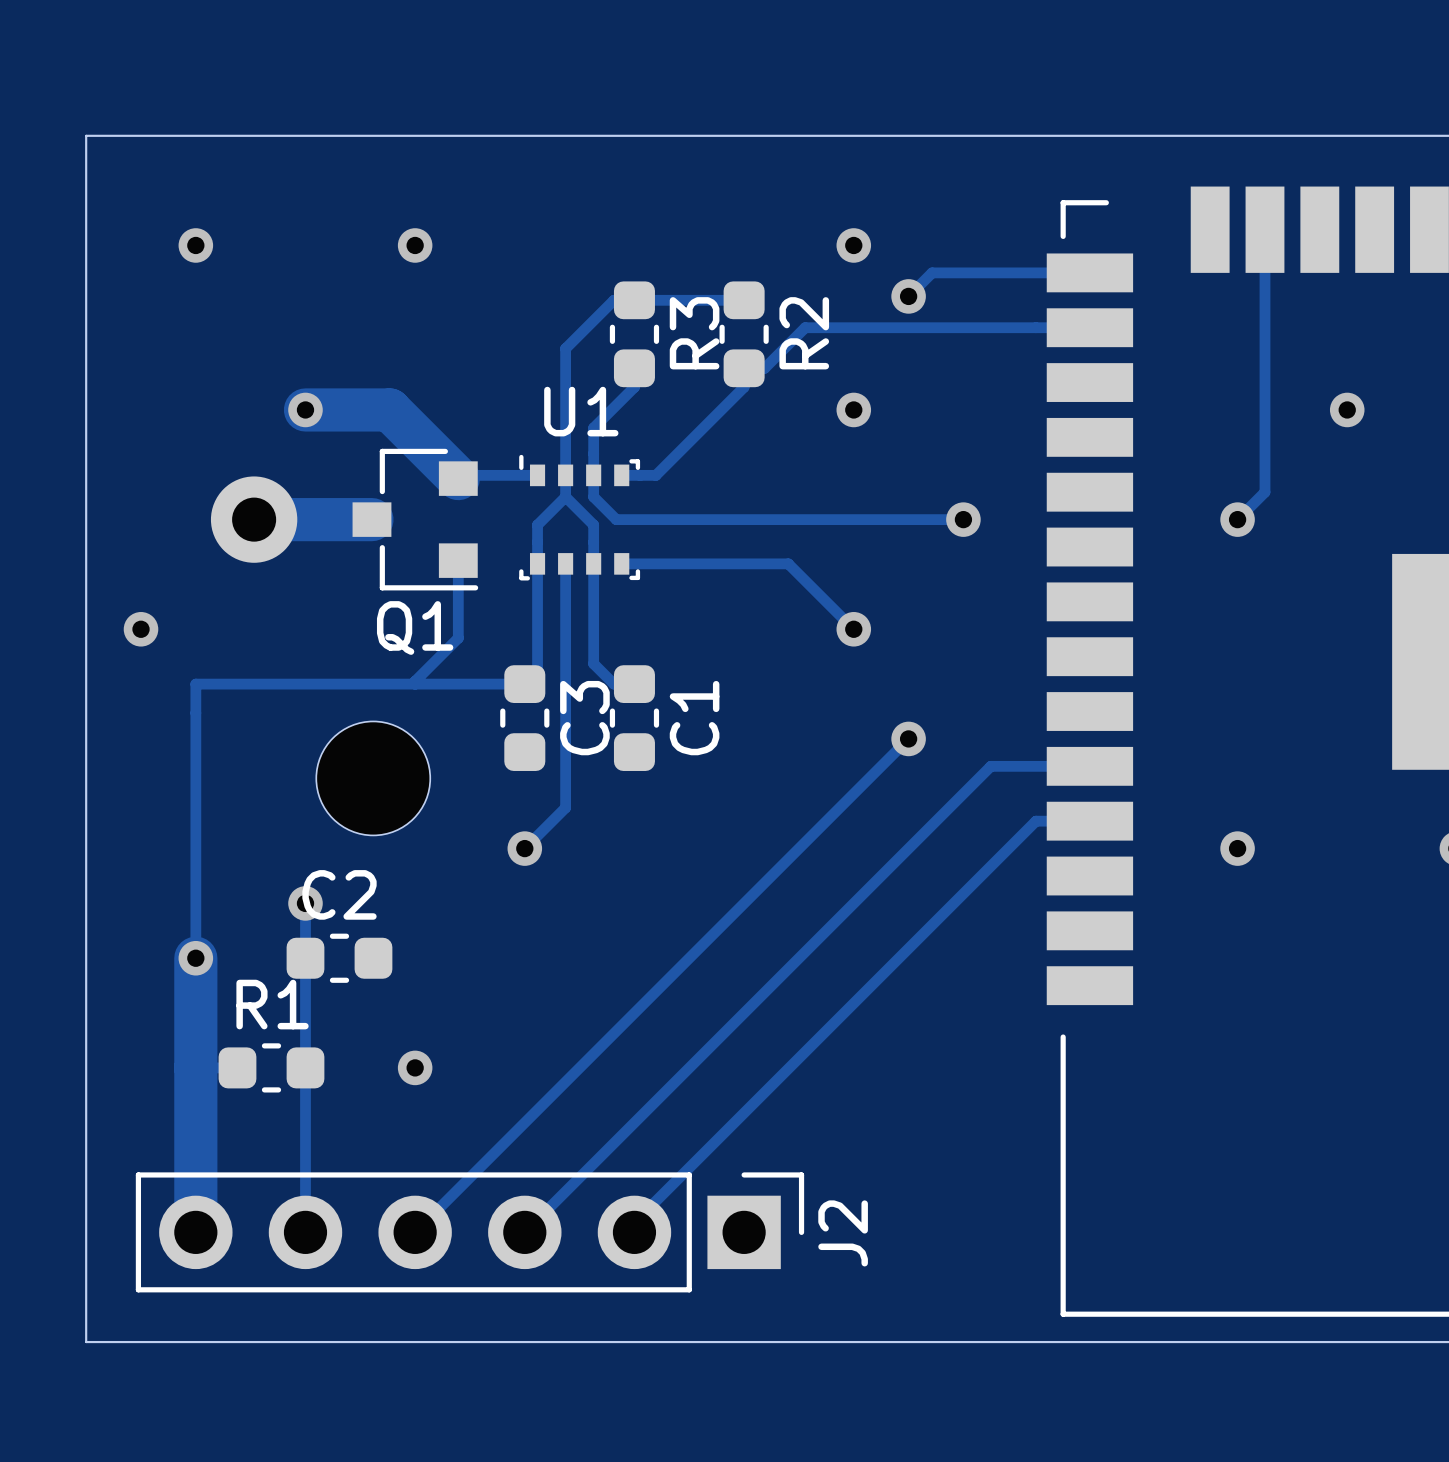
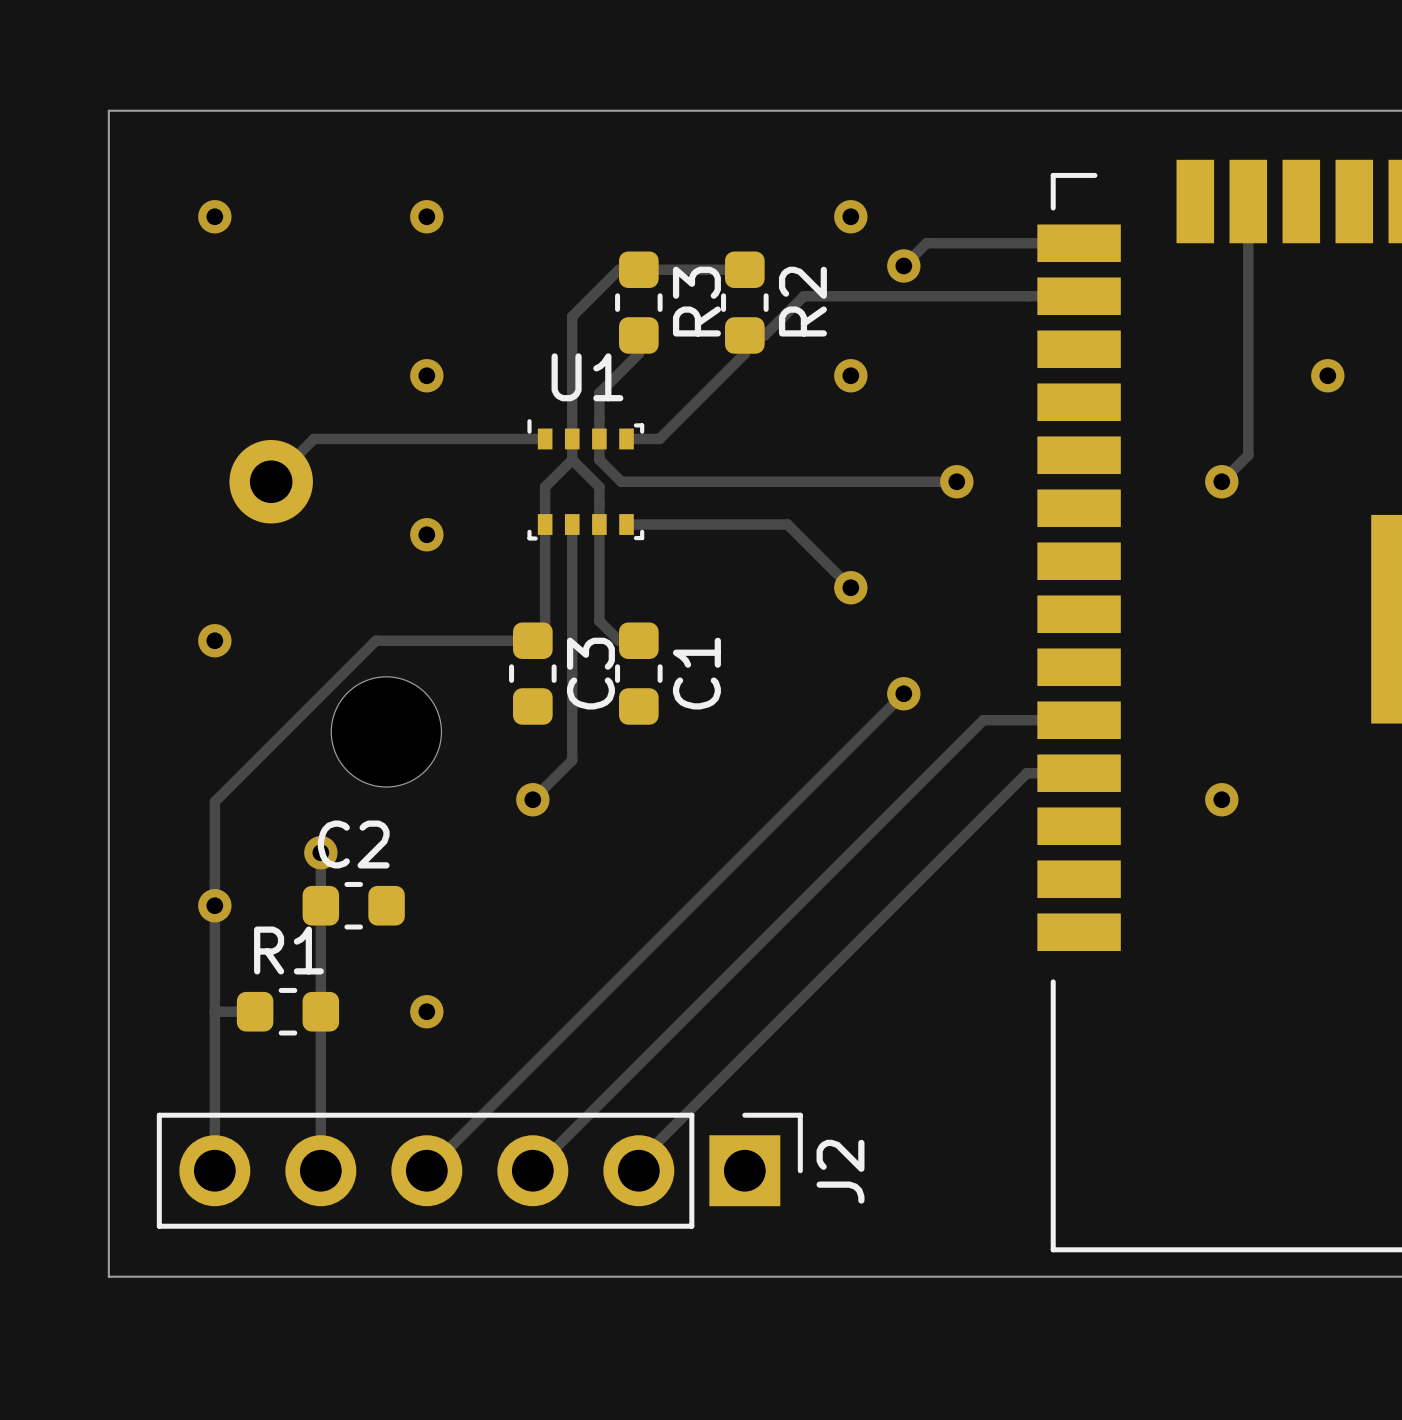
track: (305, 409) (389, 409) (458, 478) (461, 475) -> none
via: (305, 409) -> none
via: none -> (426, 375)
track: (254, 519) (371, 519) -> (271, 481) (313, 438) (471, 438)
Q1: (415, 519) -> none
track: (458, 560) (458, 638) (415, 681) (415, 684) -> none
via: none -> (426, 534)
via position: (141, 629) -> (214, 640)
track: (362, 684) (195, 684) (195, 850) -> (375, 640) (214, 801)
track width: thick (195, 958) (195, 1232) -> thin (214, 905) (214, 1170)

